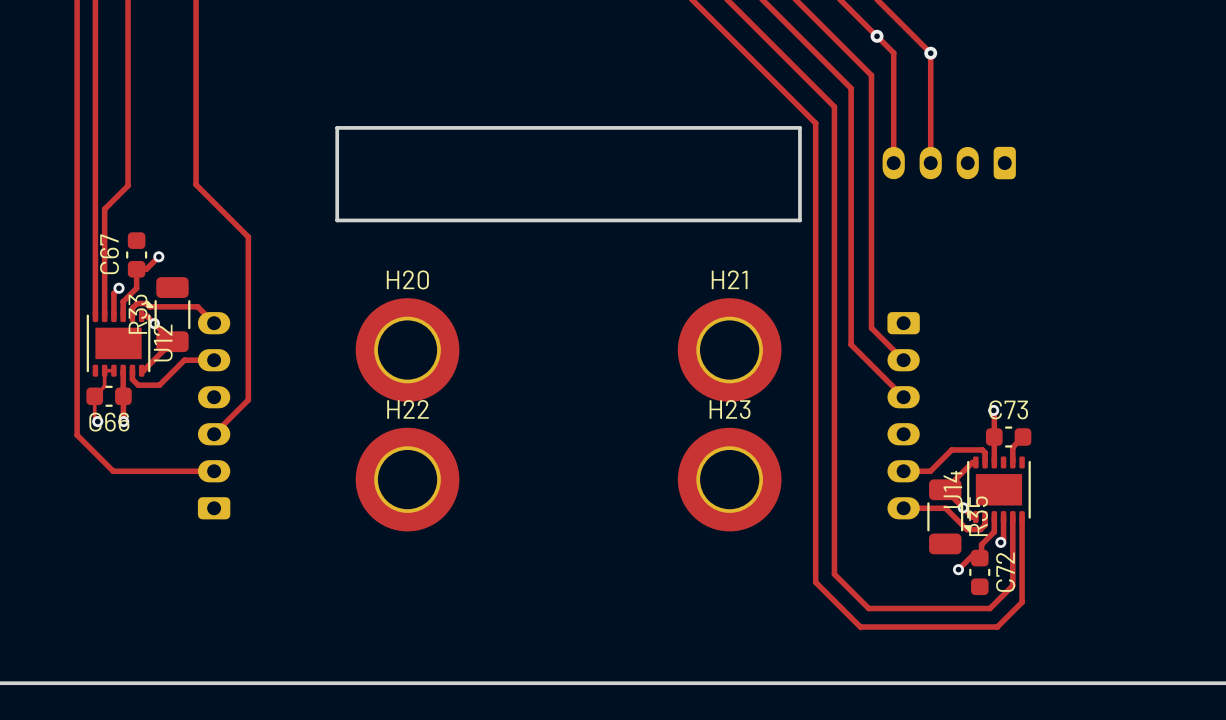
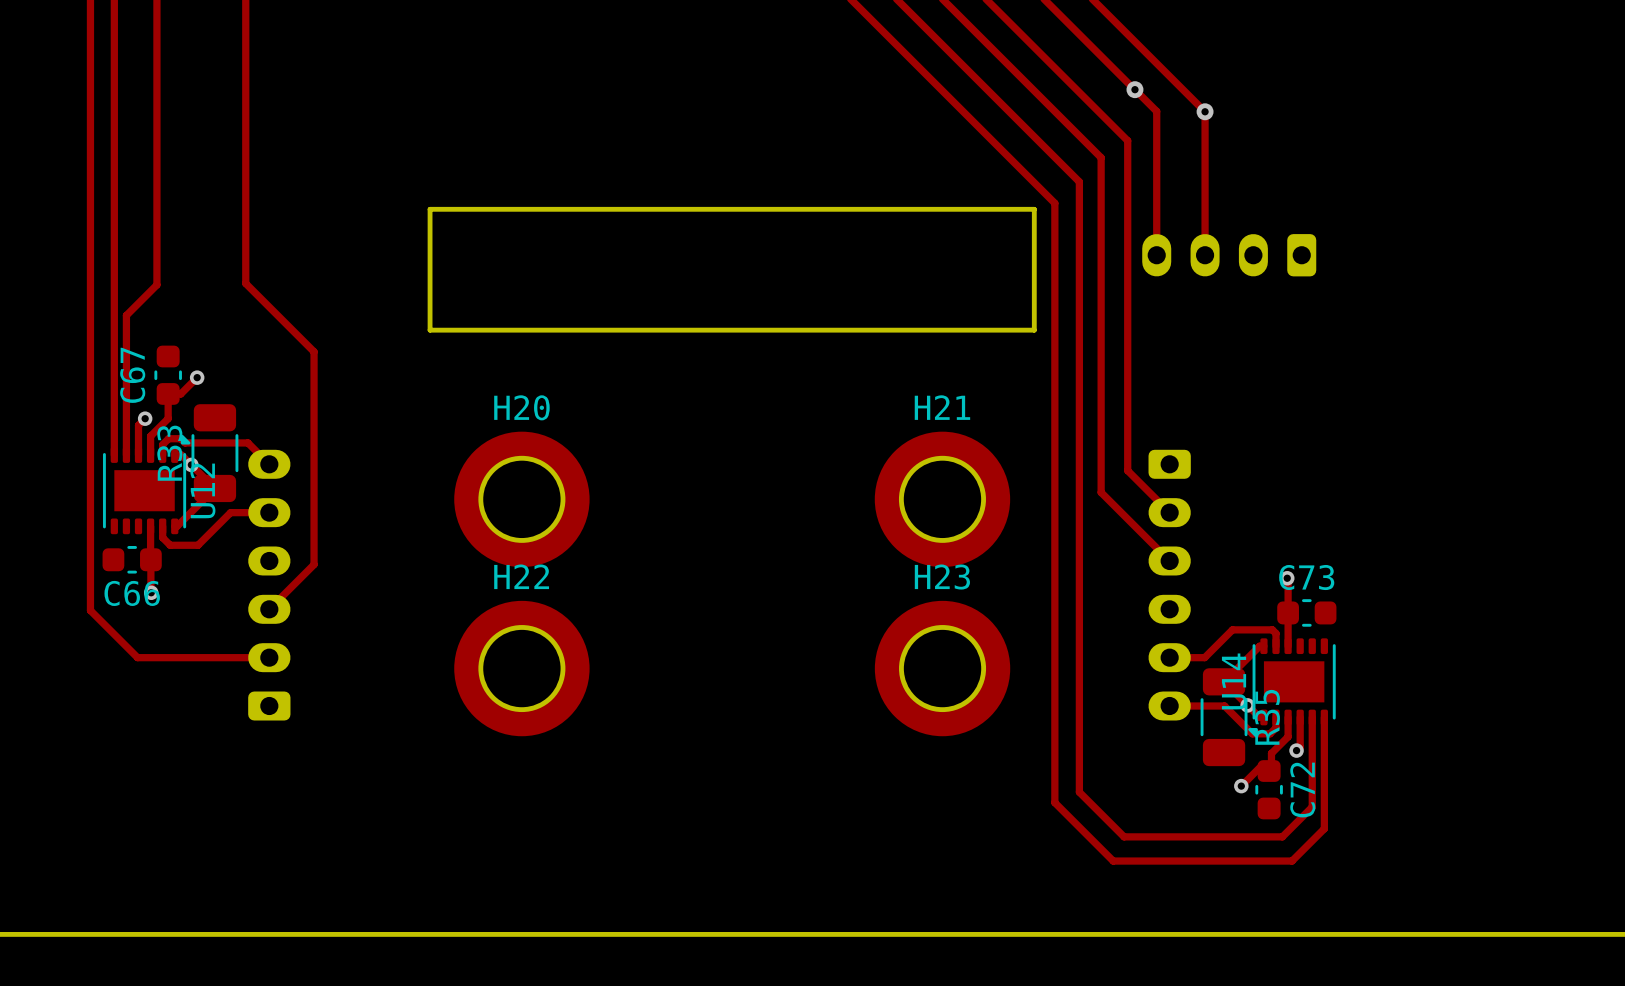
track: (113, 370) (104, 370) (104, 386) (94, 396) (94, 418) (97, 421) -> none
via: (97, 421) -> none
track: (1023, 437) (1012, 447) (1012, 462) -> none

